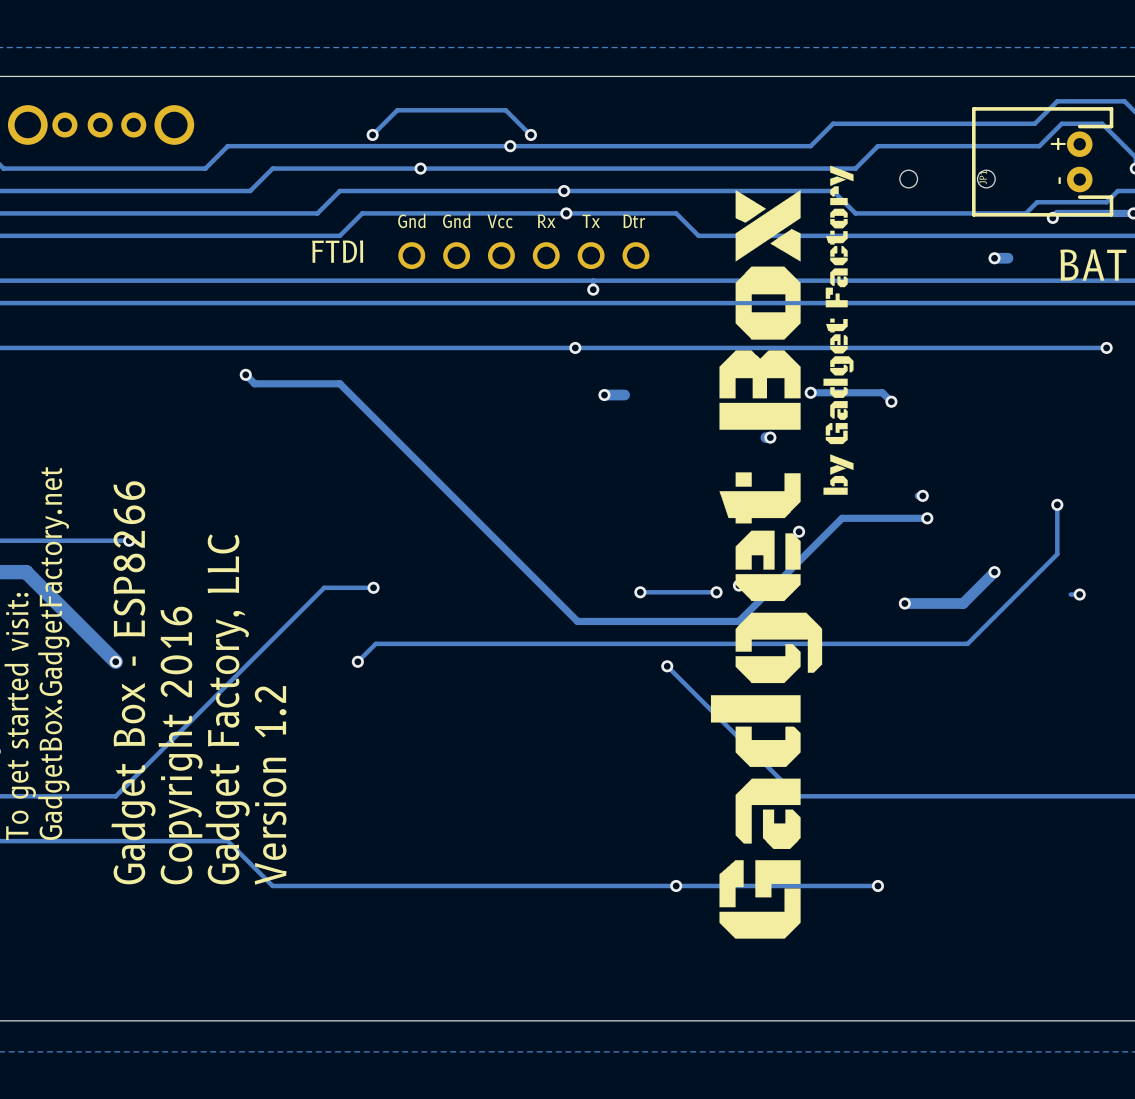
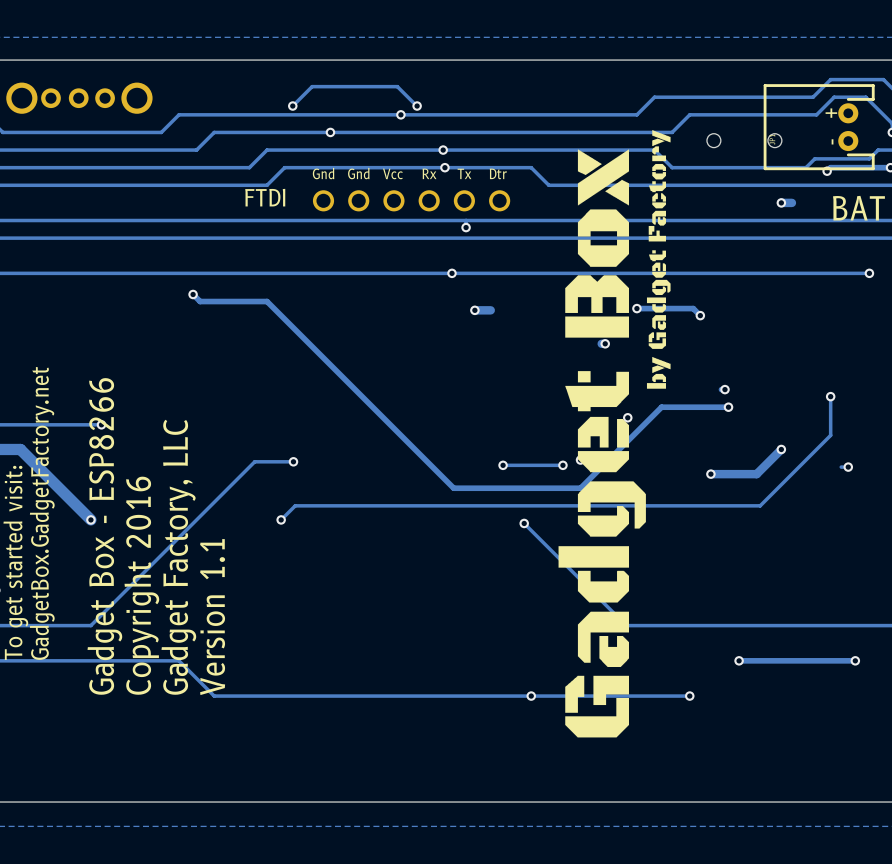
text: Version 1.2 (270, 785) -> Version 1.1 (212, 617)
via: none -> (739, 660)
track: none -> (855, 660) (739, 660)
via: none -> (855, 660)

